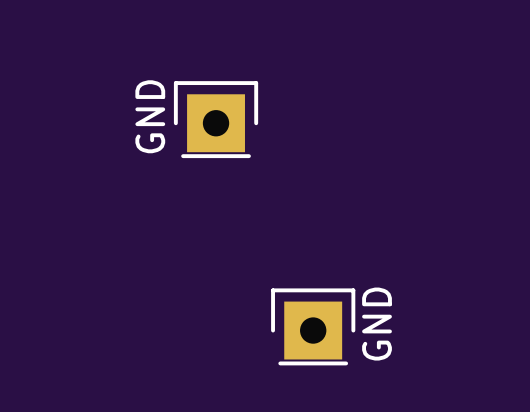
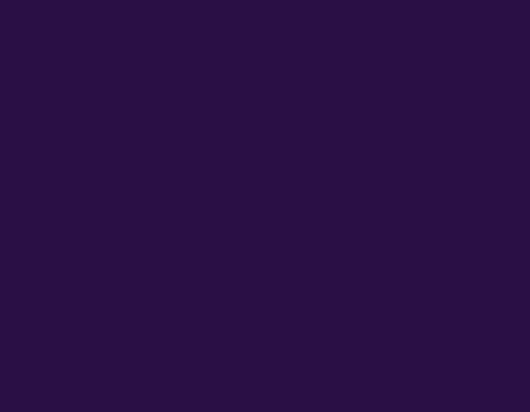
GND: (216, 119) -> none
GND: (313, 326) -> none

